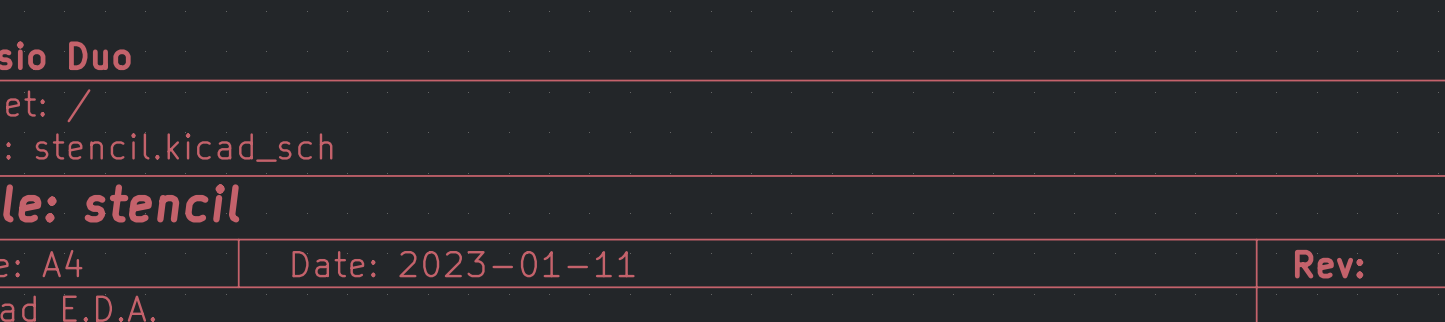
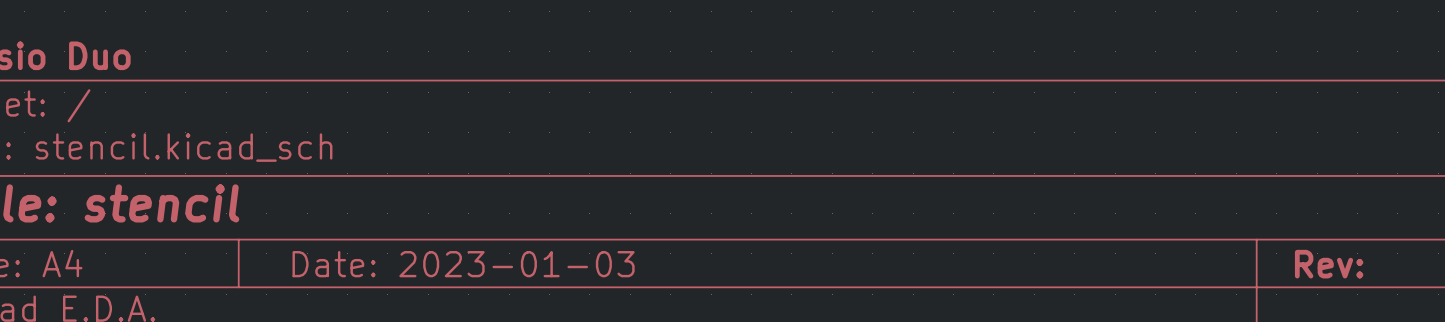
title block: Date: 2023-01-11 (463, 264) -> Date: 2023-01-03 (463, 264)

